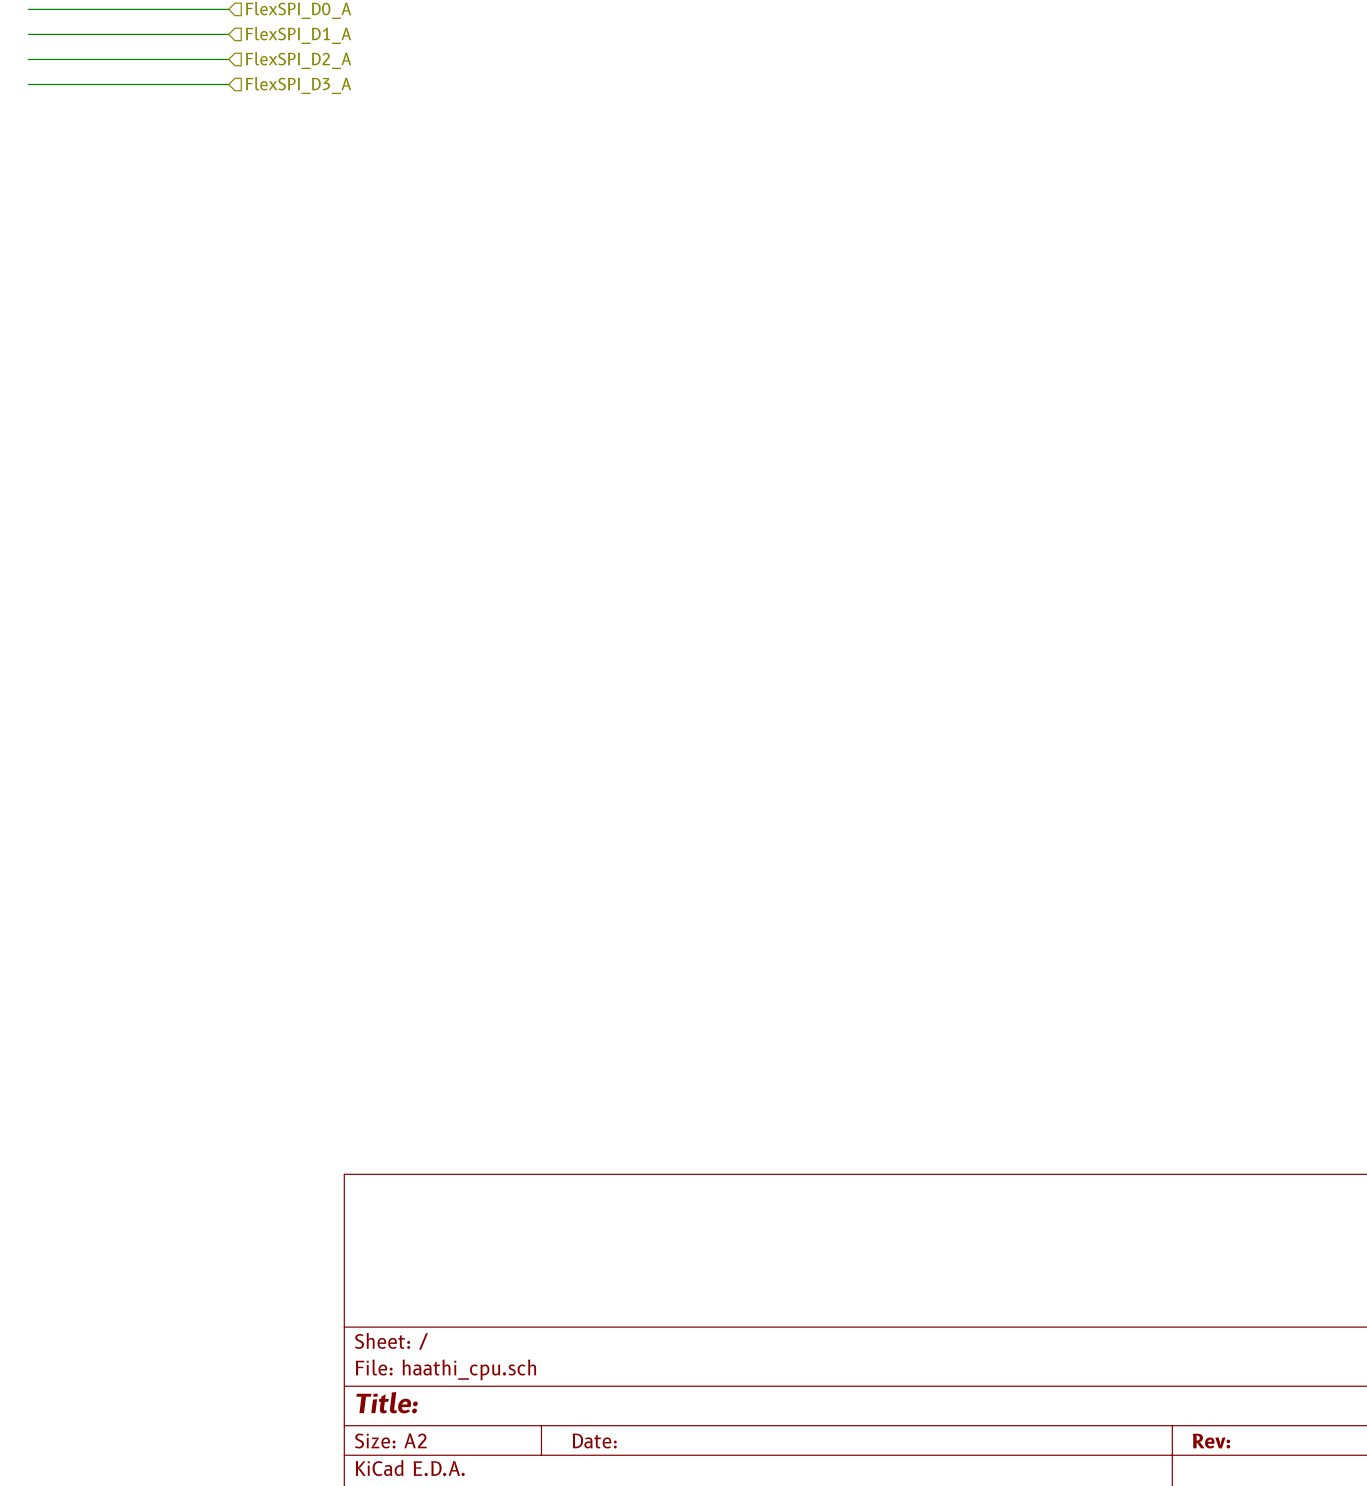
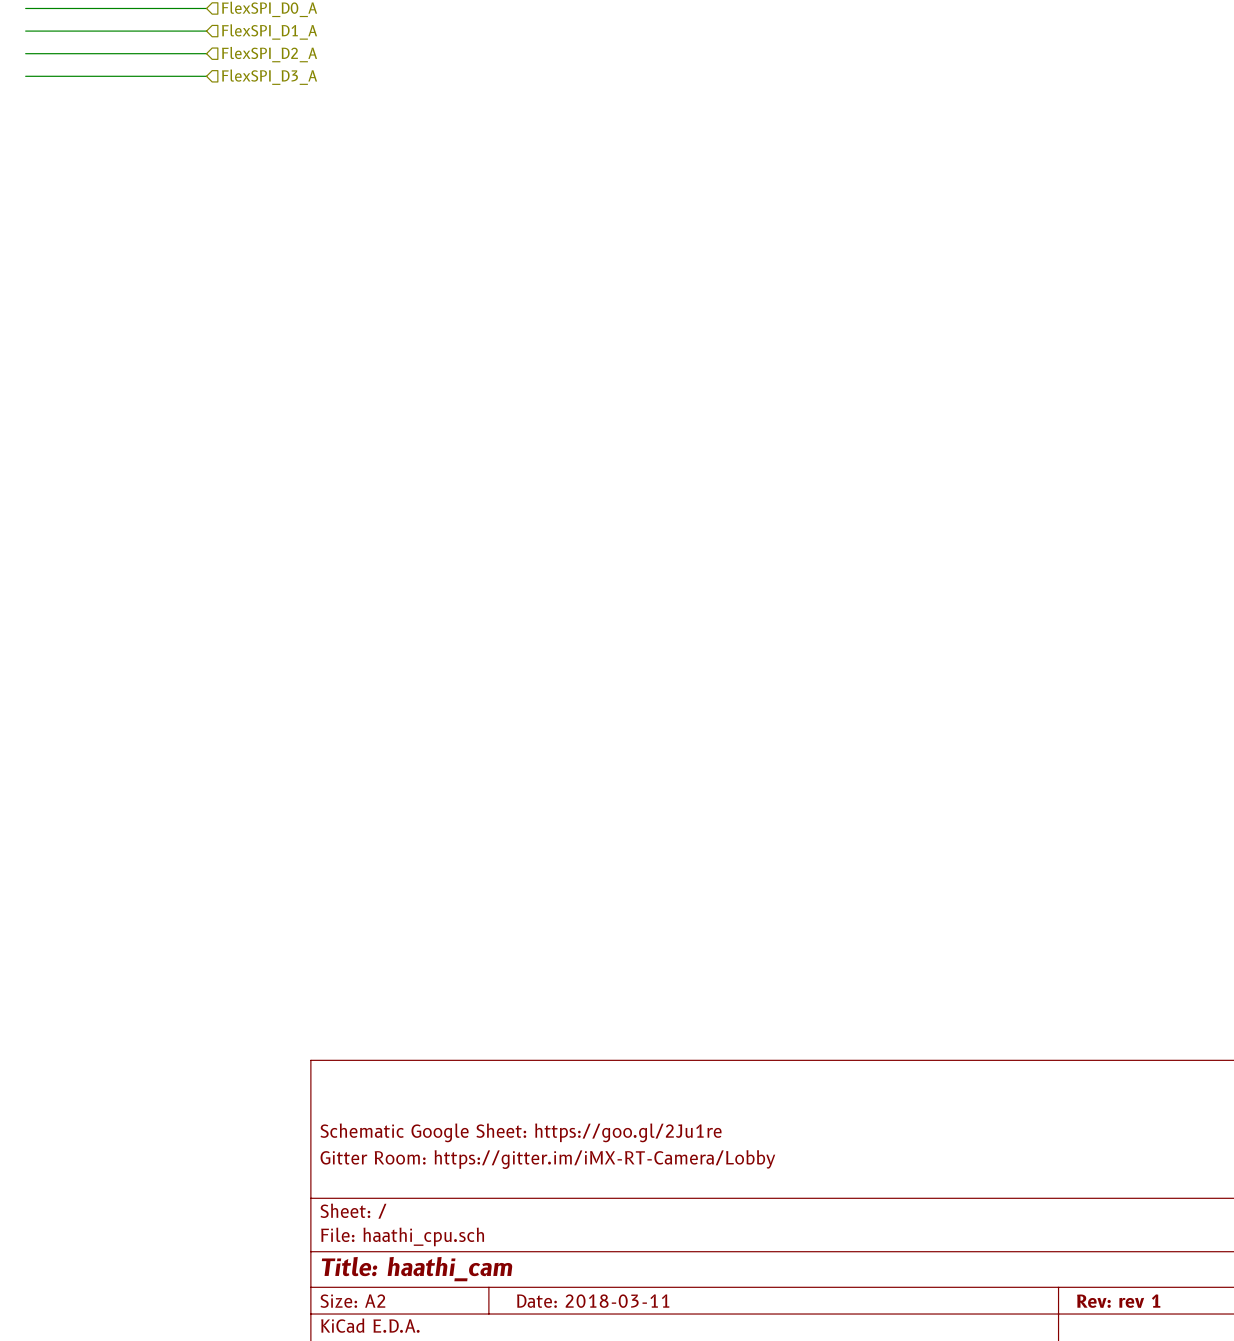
title block: none -> Schematic Google Sheet: https://goo.gl/2Ju1re (521, 1132)
title block: none -> Gitter Room: https://gitter.im/iMX-RT-Camera/Lobby (547, 1159)
title block: Title: (387, 1402) -> Title: haathi_cam (417, 1269)
title block: Date: (594, 1441) -> Date: 2018-03-11 (593, 1301)
title block: Rev: (1211, 1441) -> Rev: rev 1 (1118, 1301)

